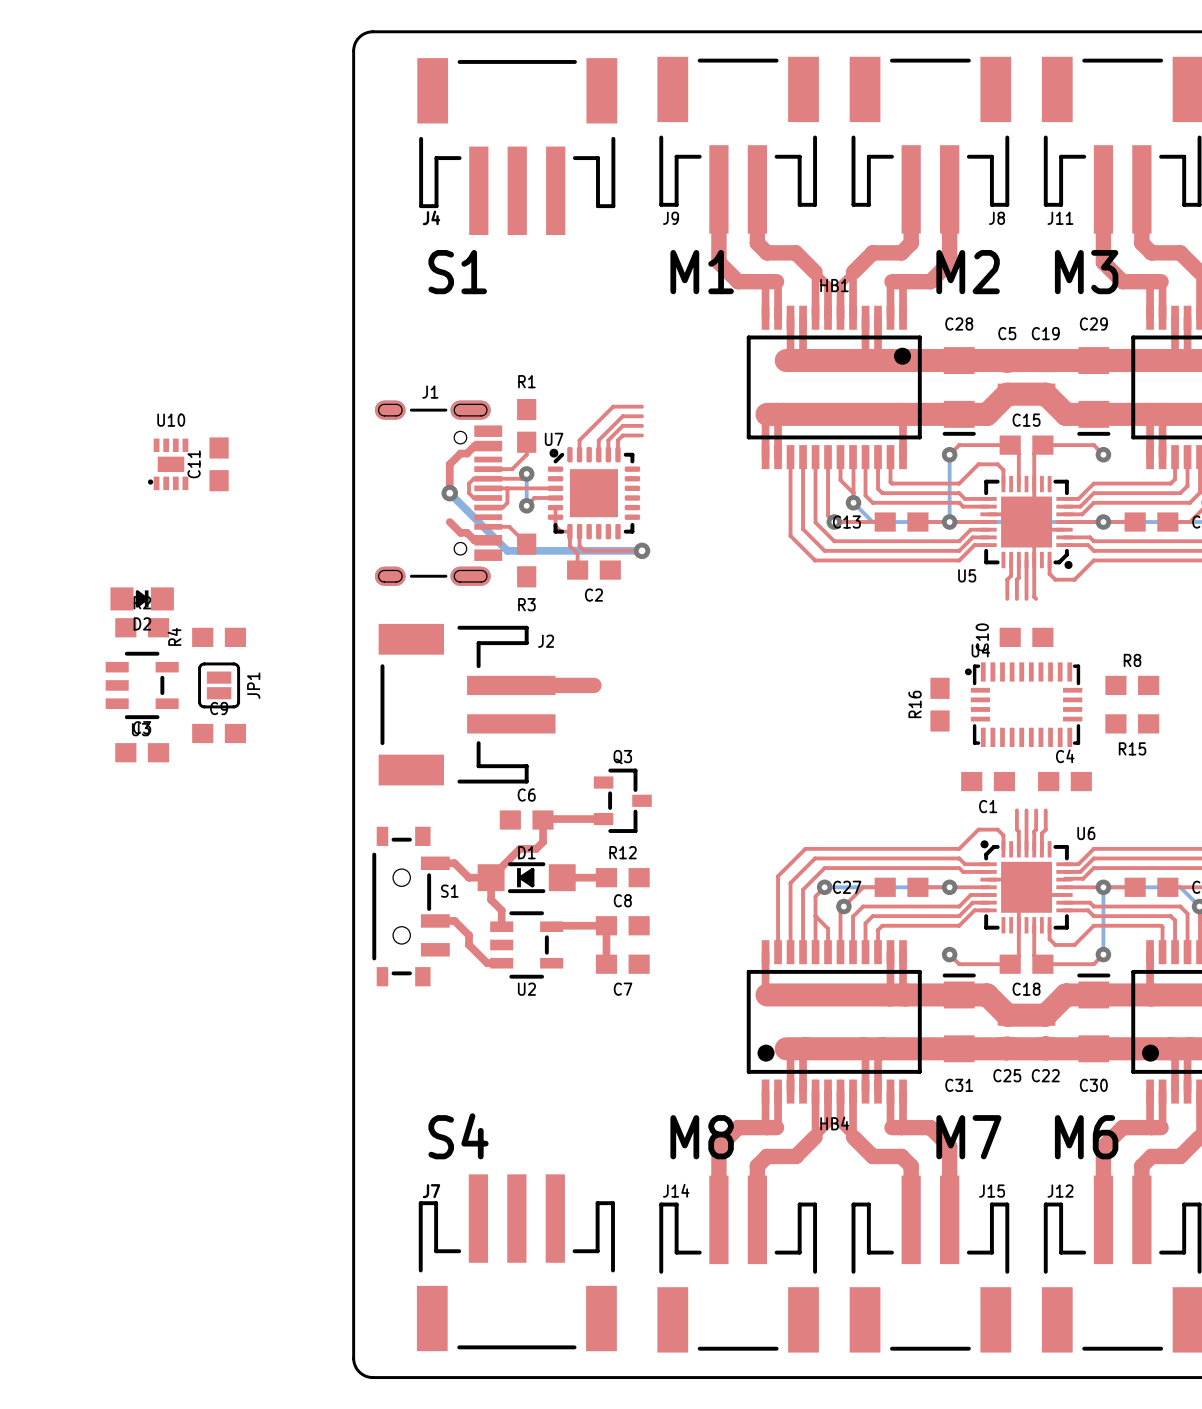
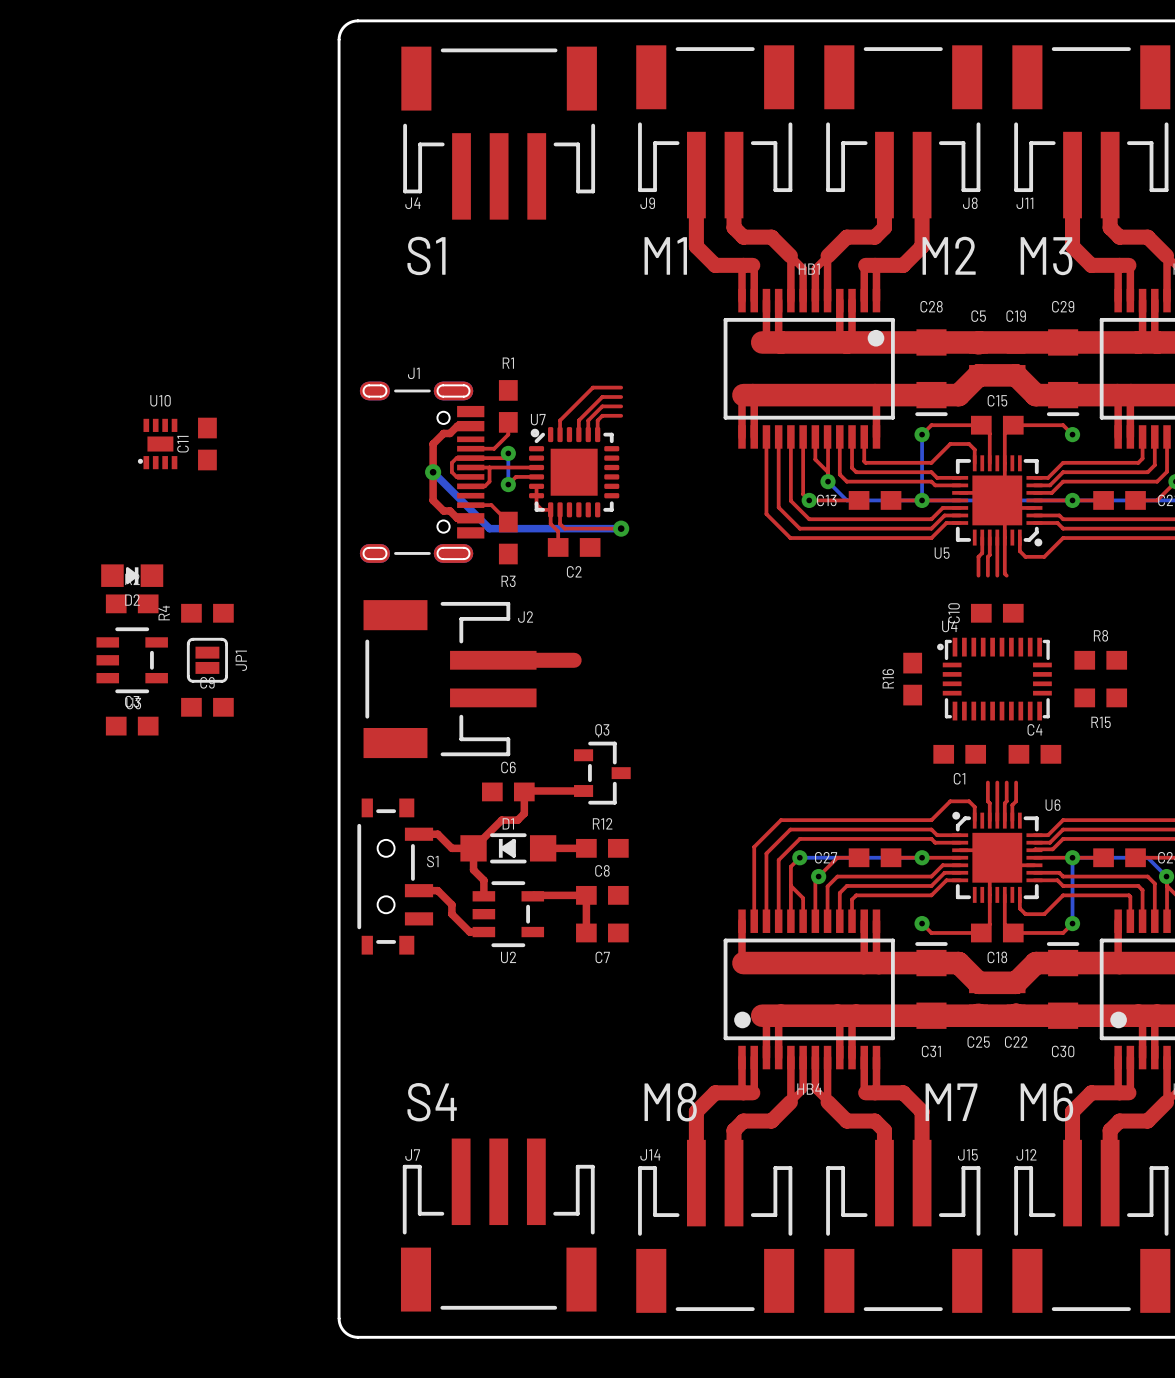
top track: none -> (433, 472) (433, 500)

